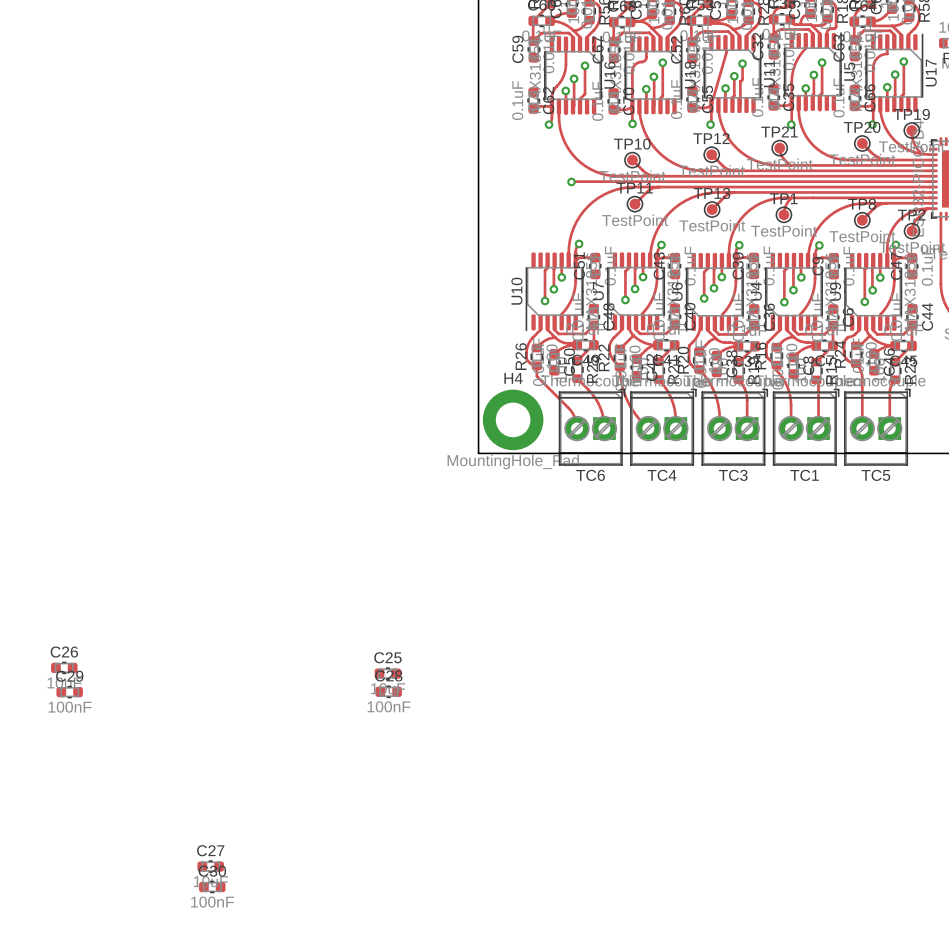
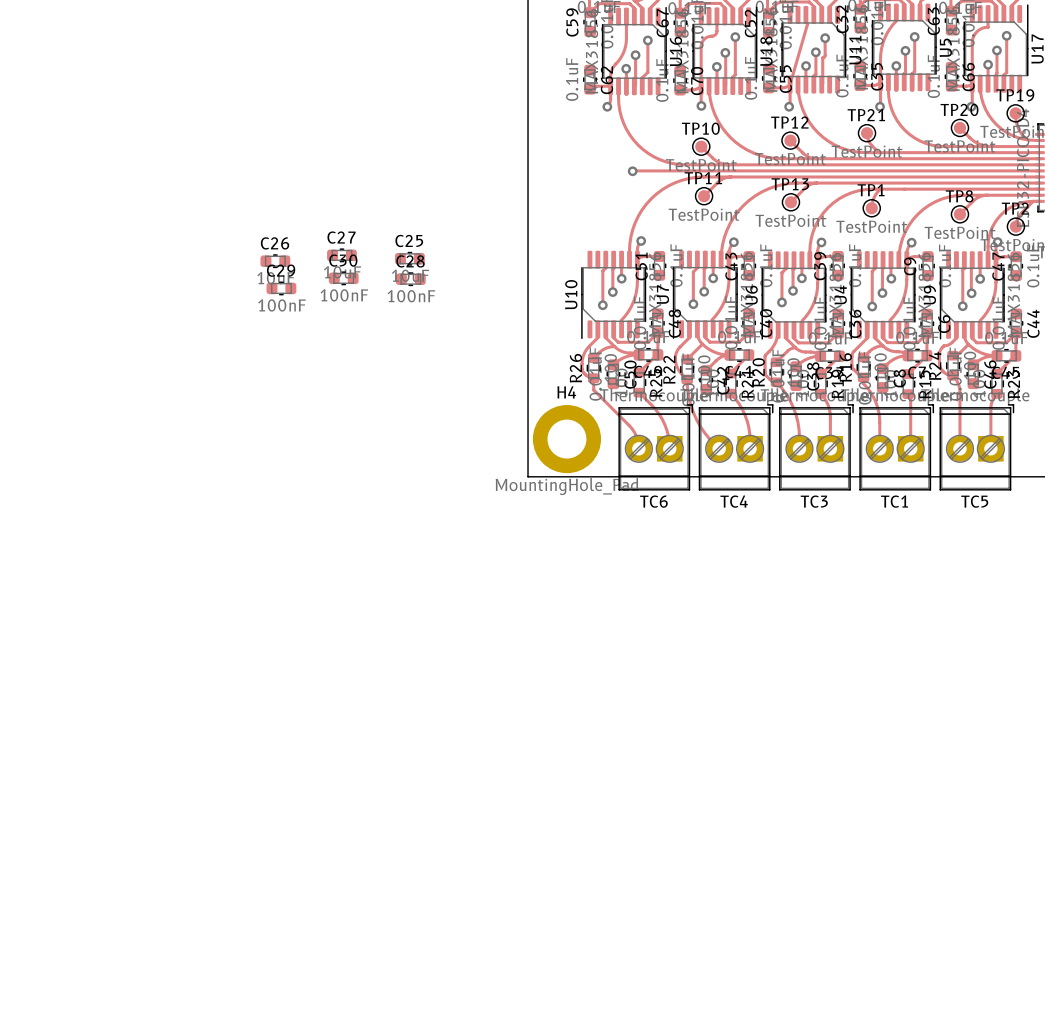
C26 position: (64, 667) -> (275, 261)
C25 position: (387, 673) -> (409, 258)
C28 position: (388, 691) -> (410, 279)
C29 position: (69, 692) -> (281, 288)
C27 position: (210, 866) -> (341, 255)
C30 position: (212, 887) -> (343, 278)

